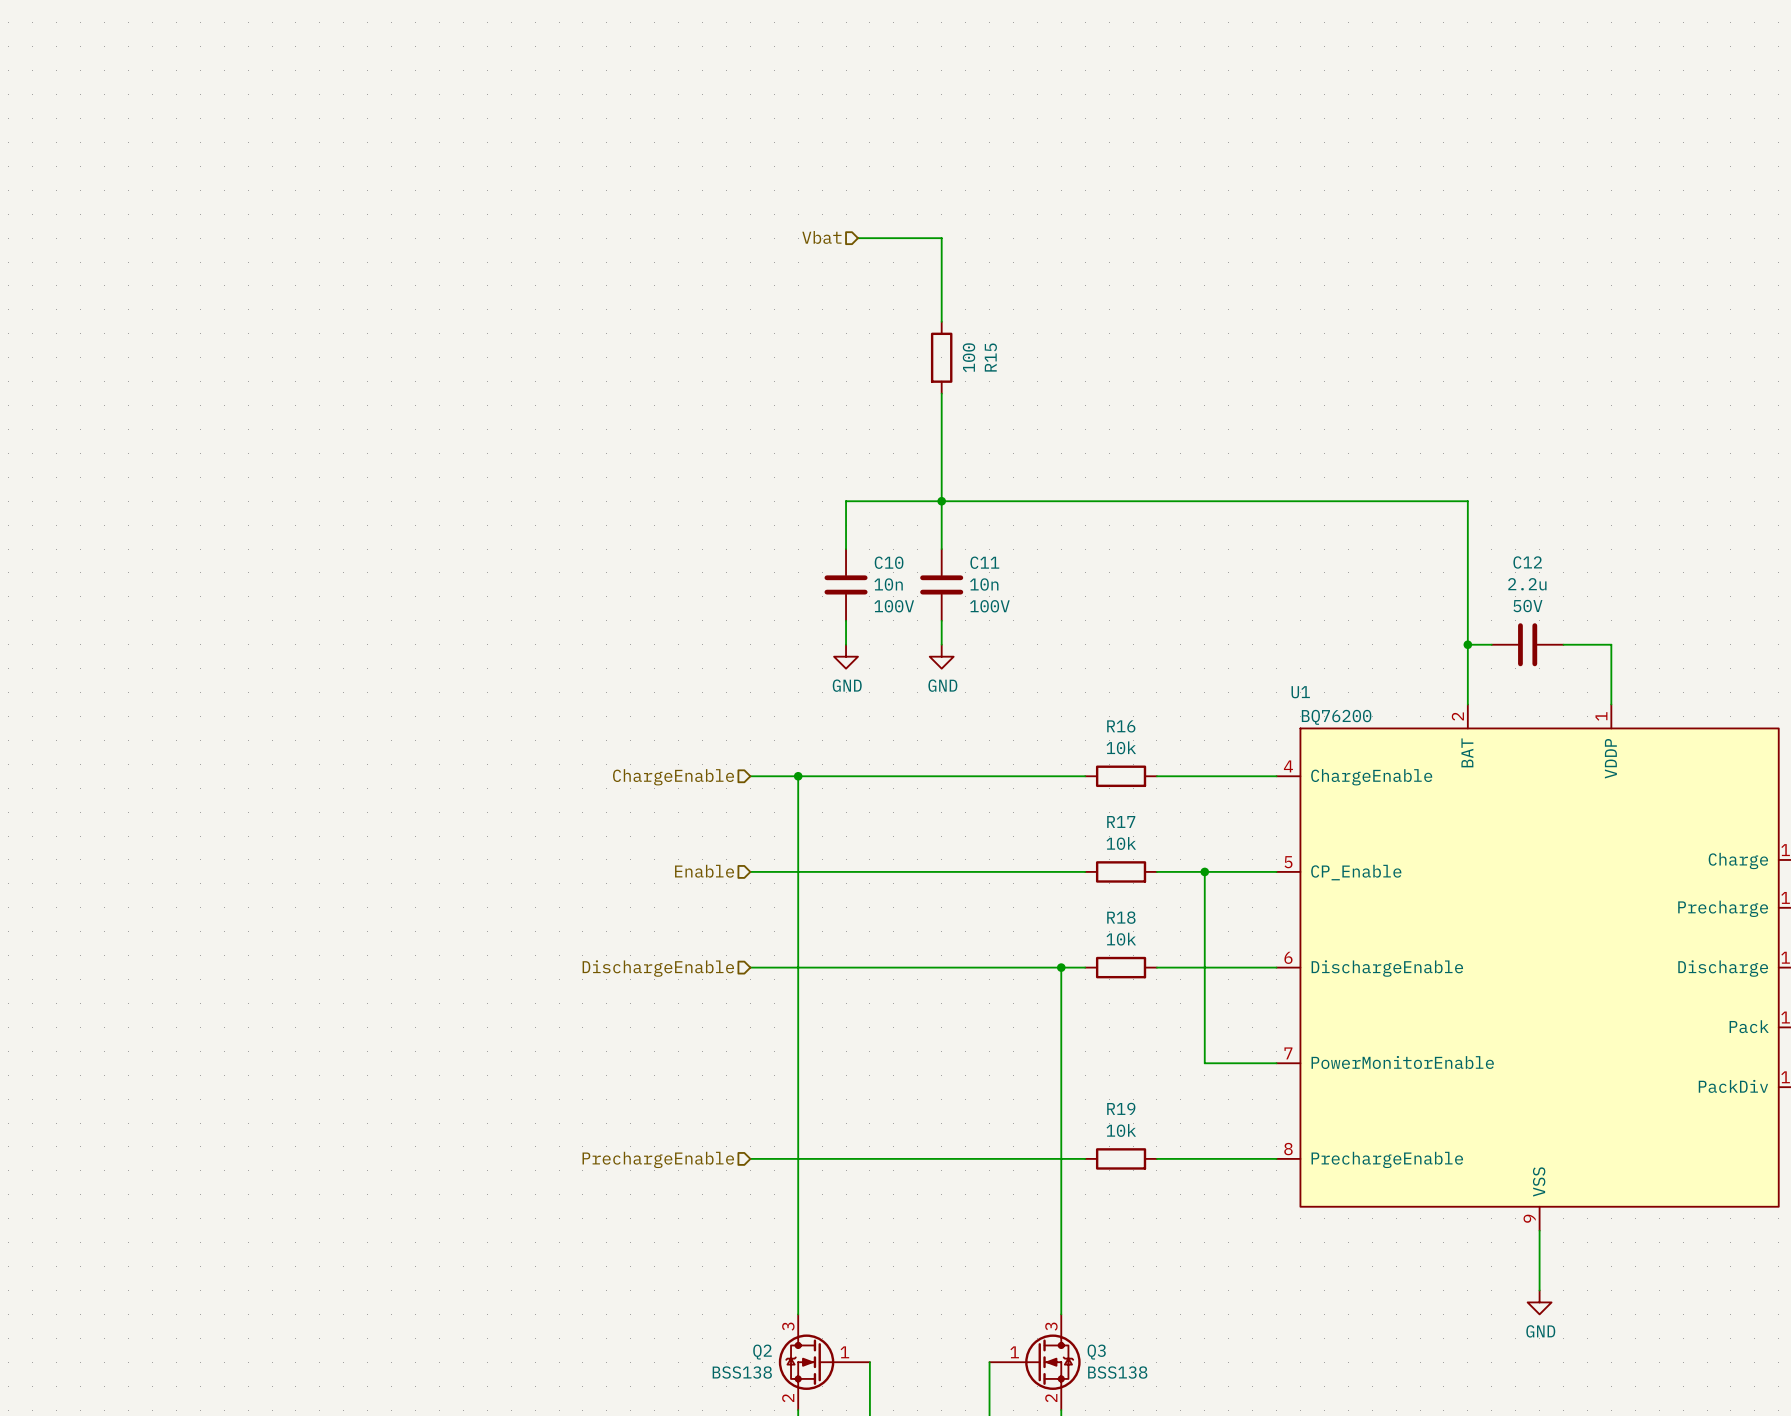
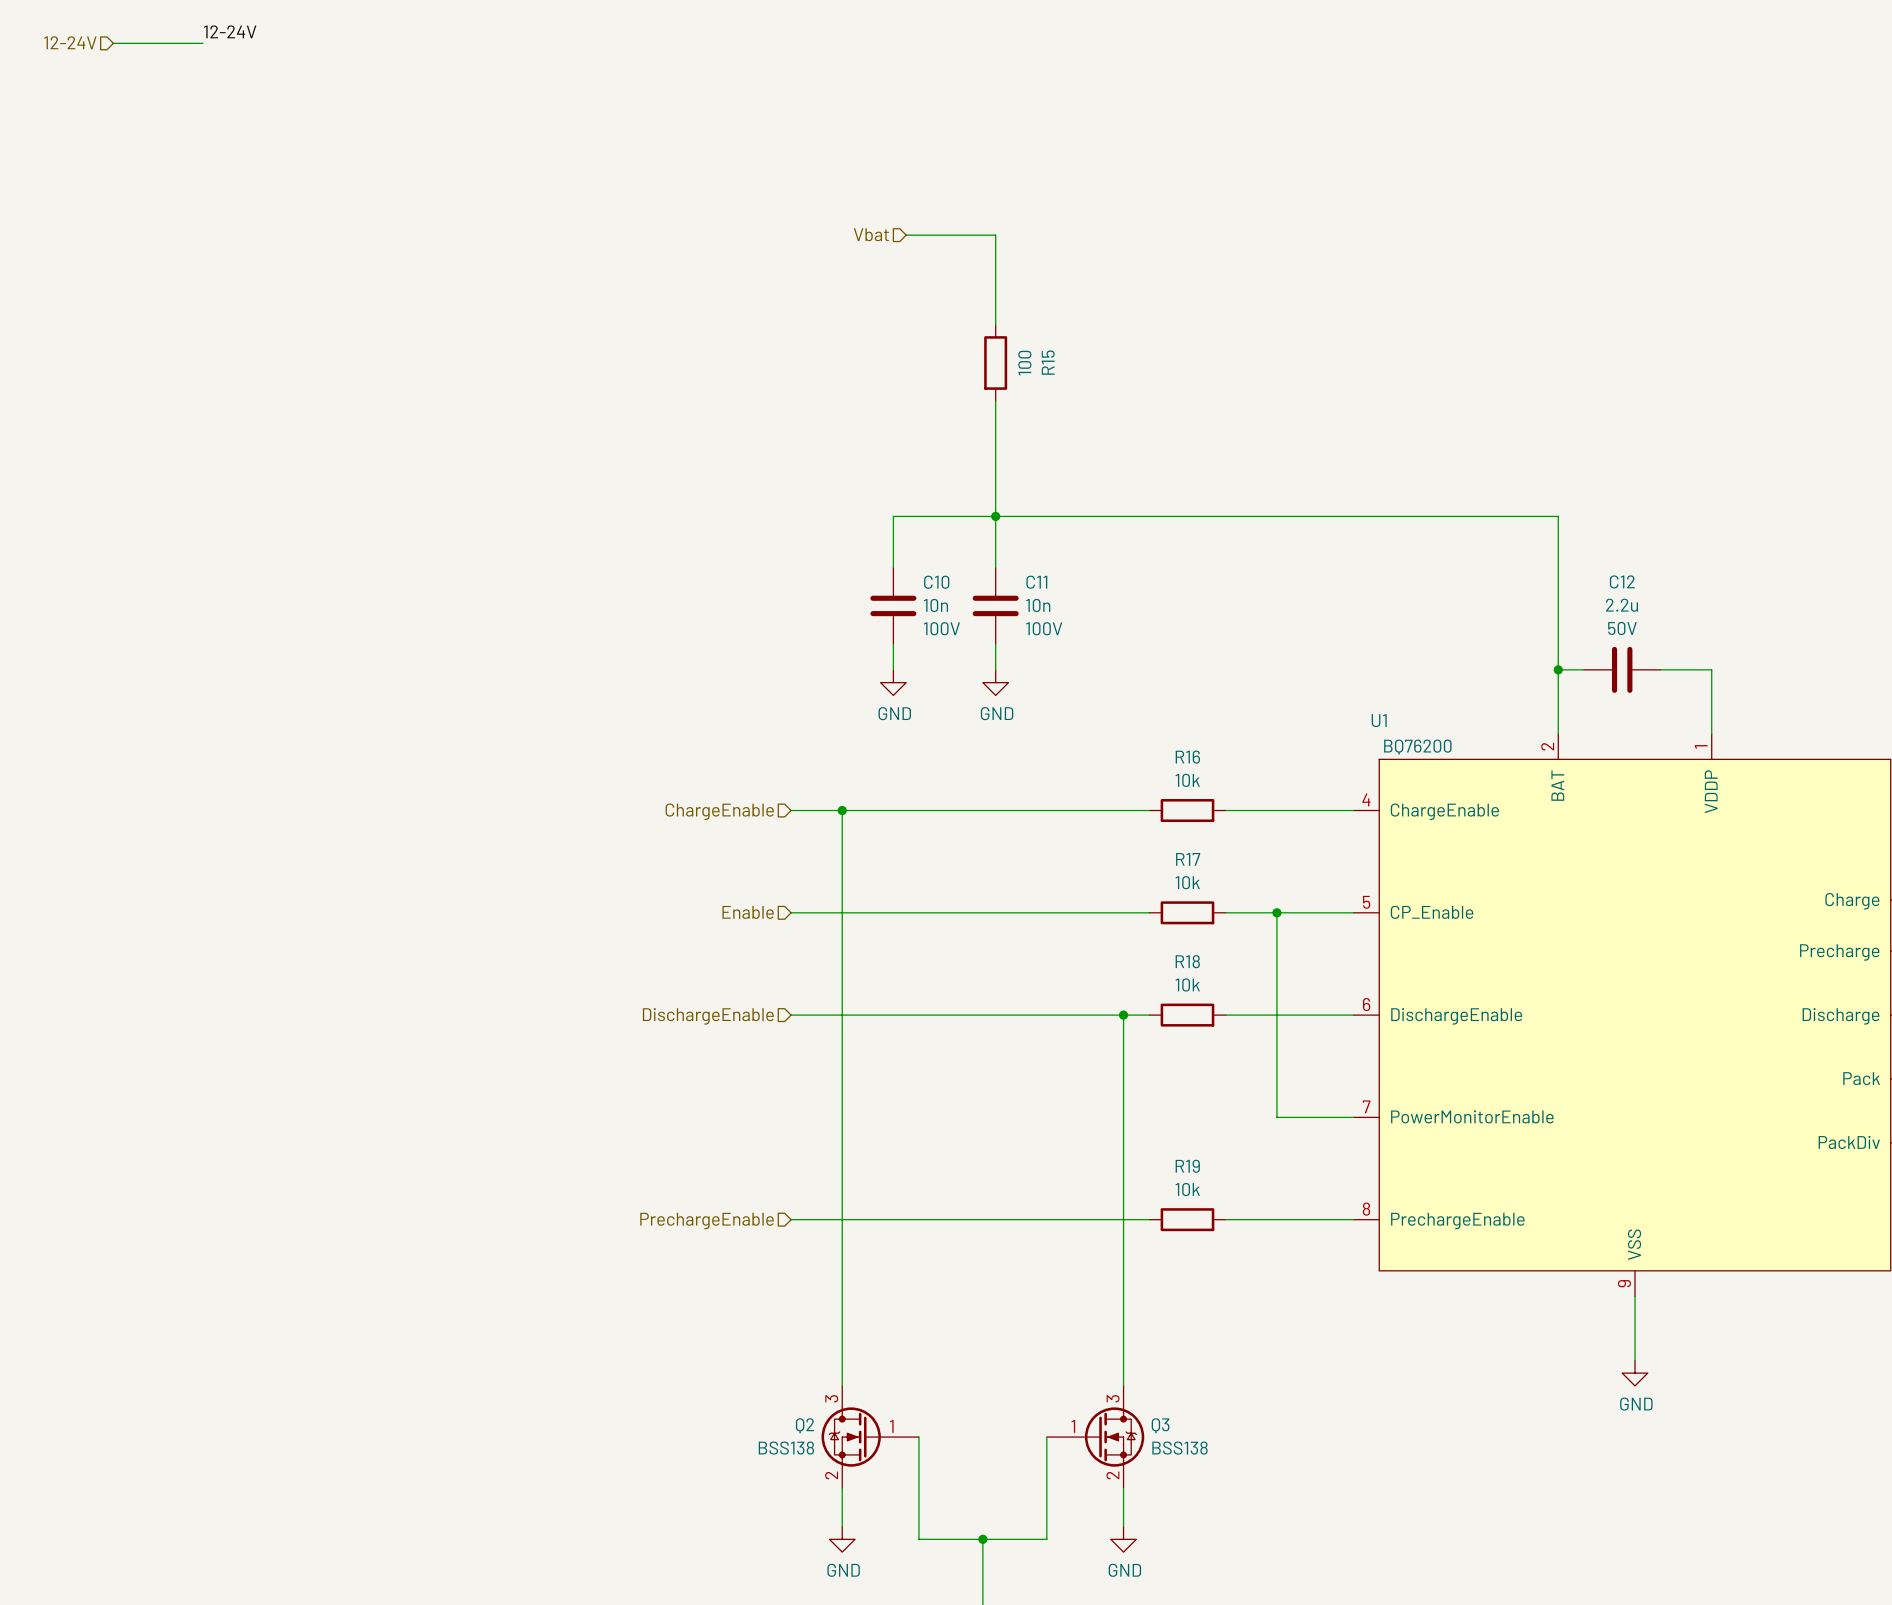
label: none -> 12-24V (230, 31)
hierarchical label: none -> 12-24V (70, 42)
wire: none -> (113, 43) (202, 43)

